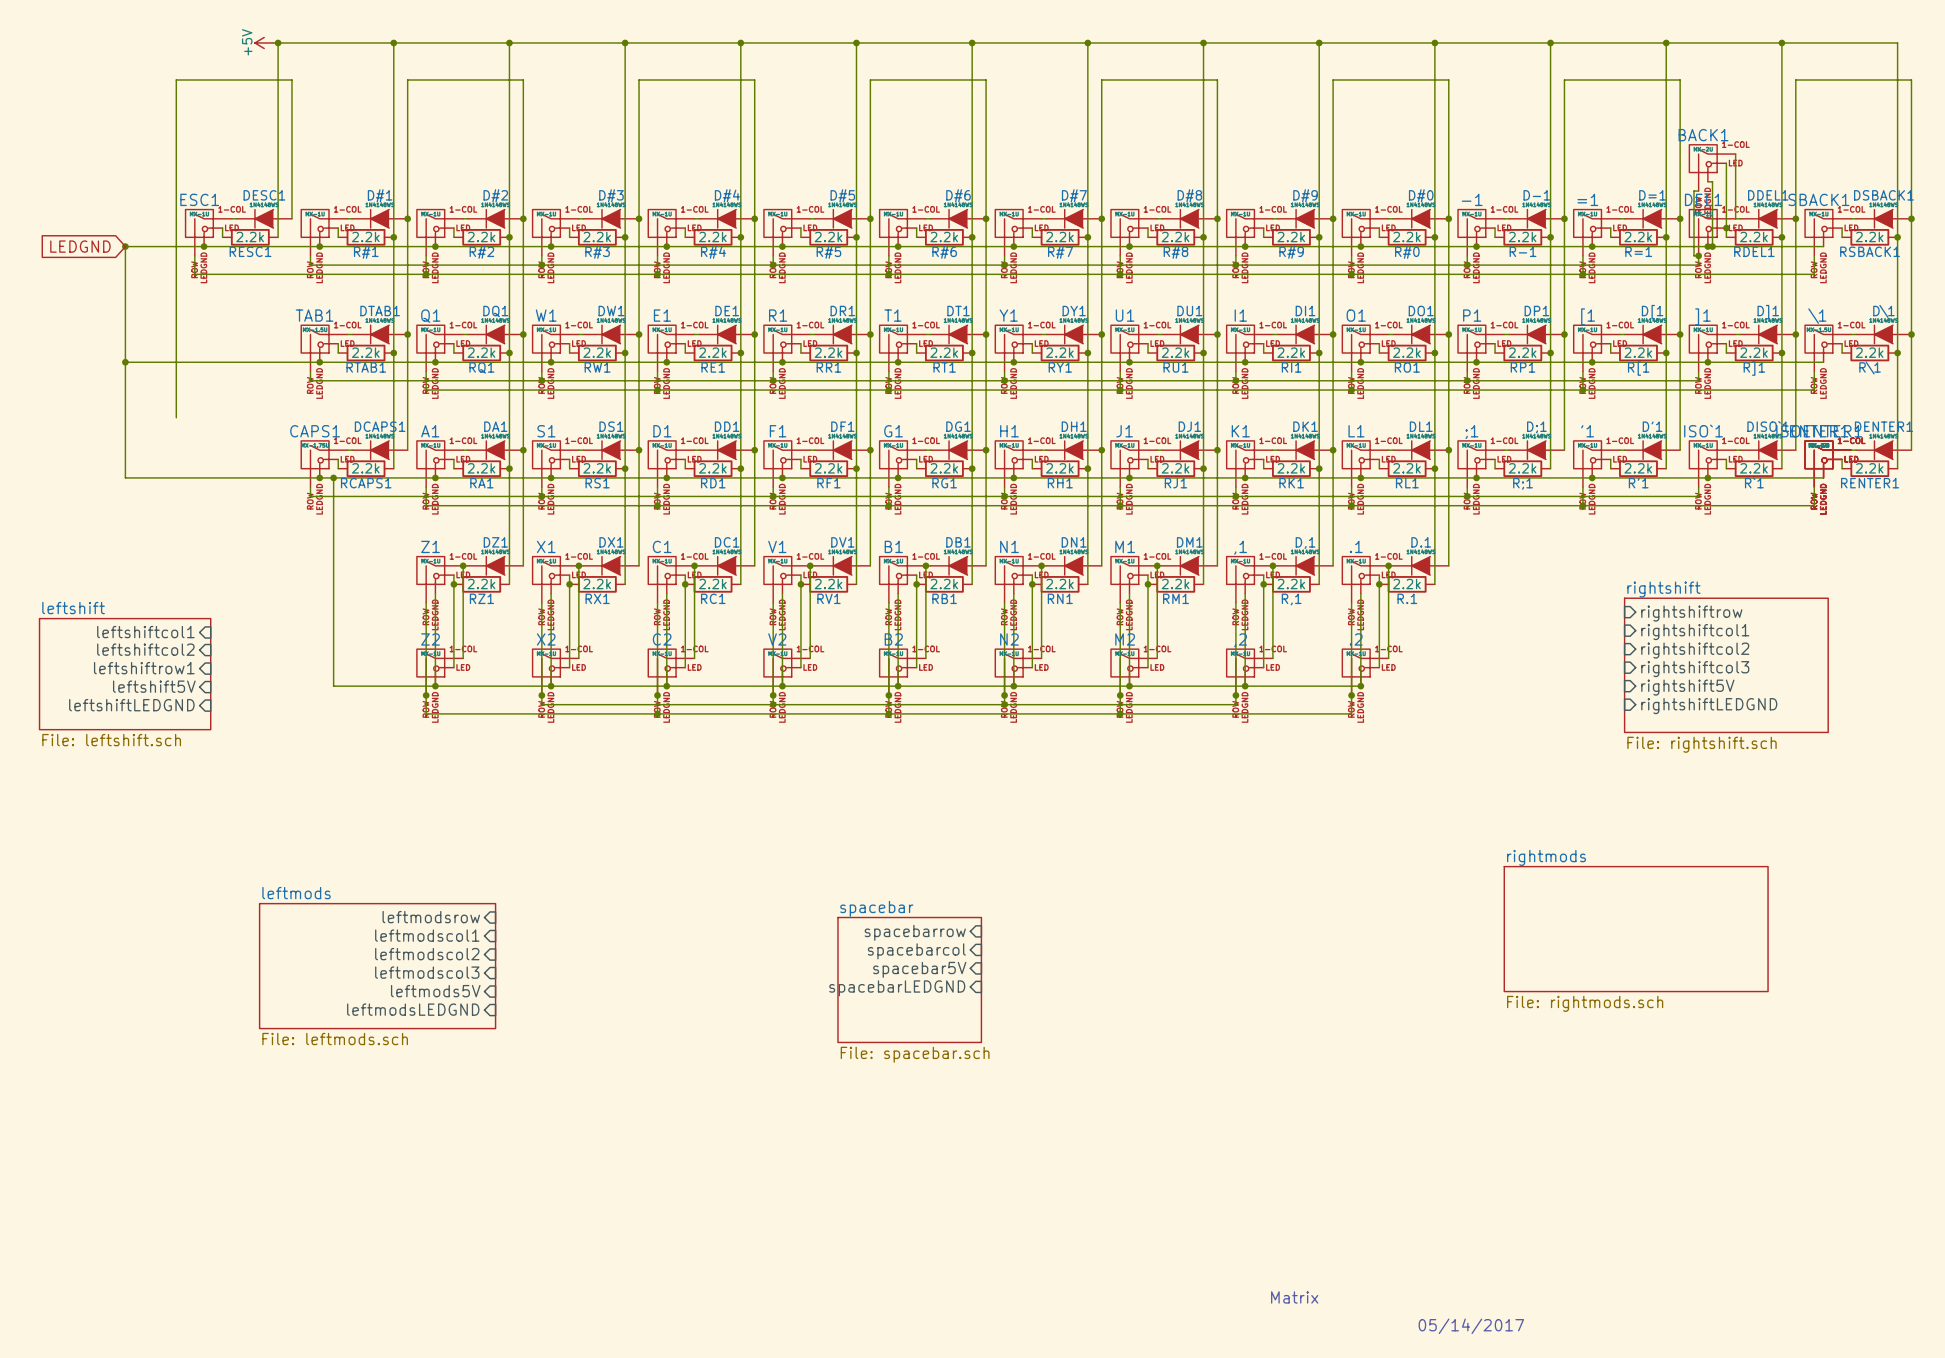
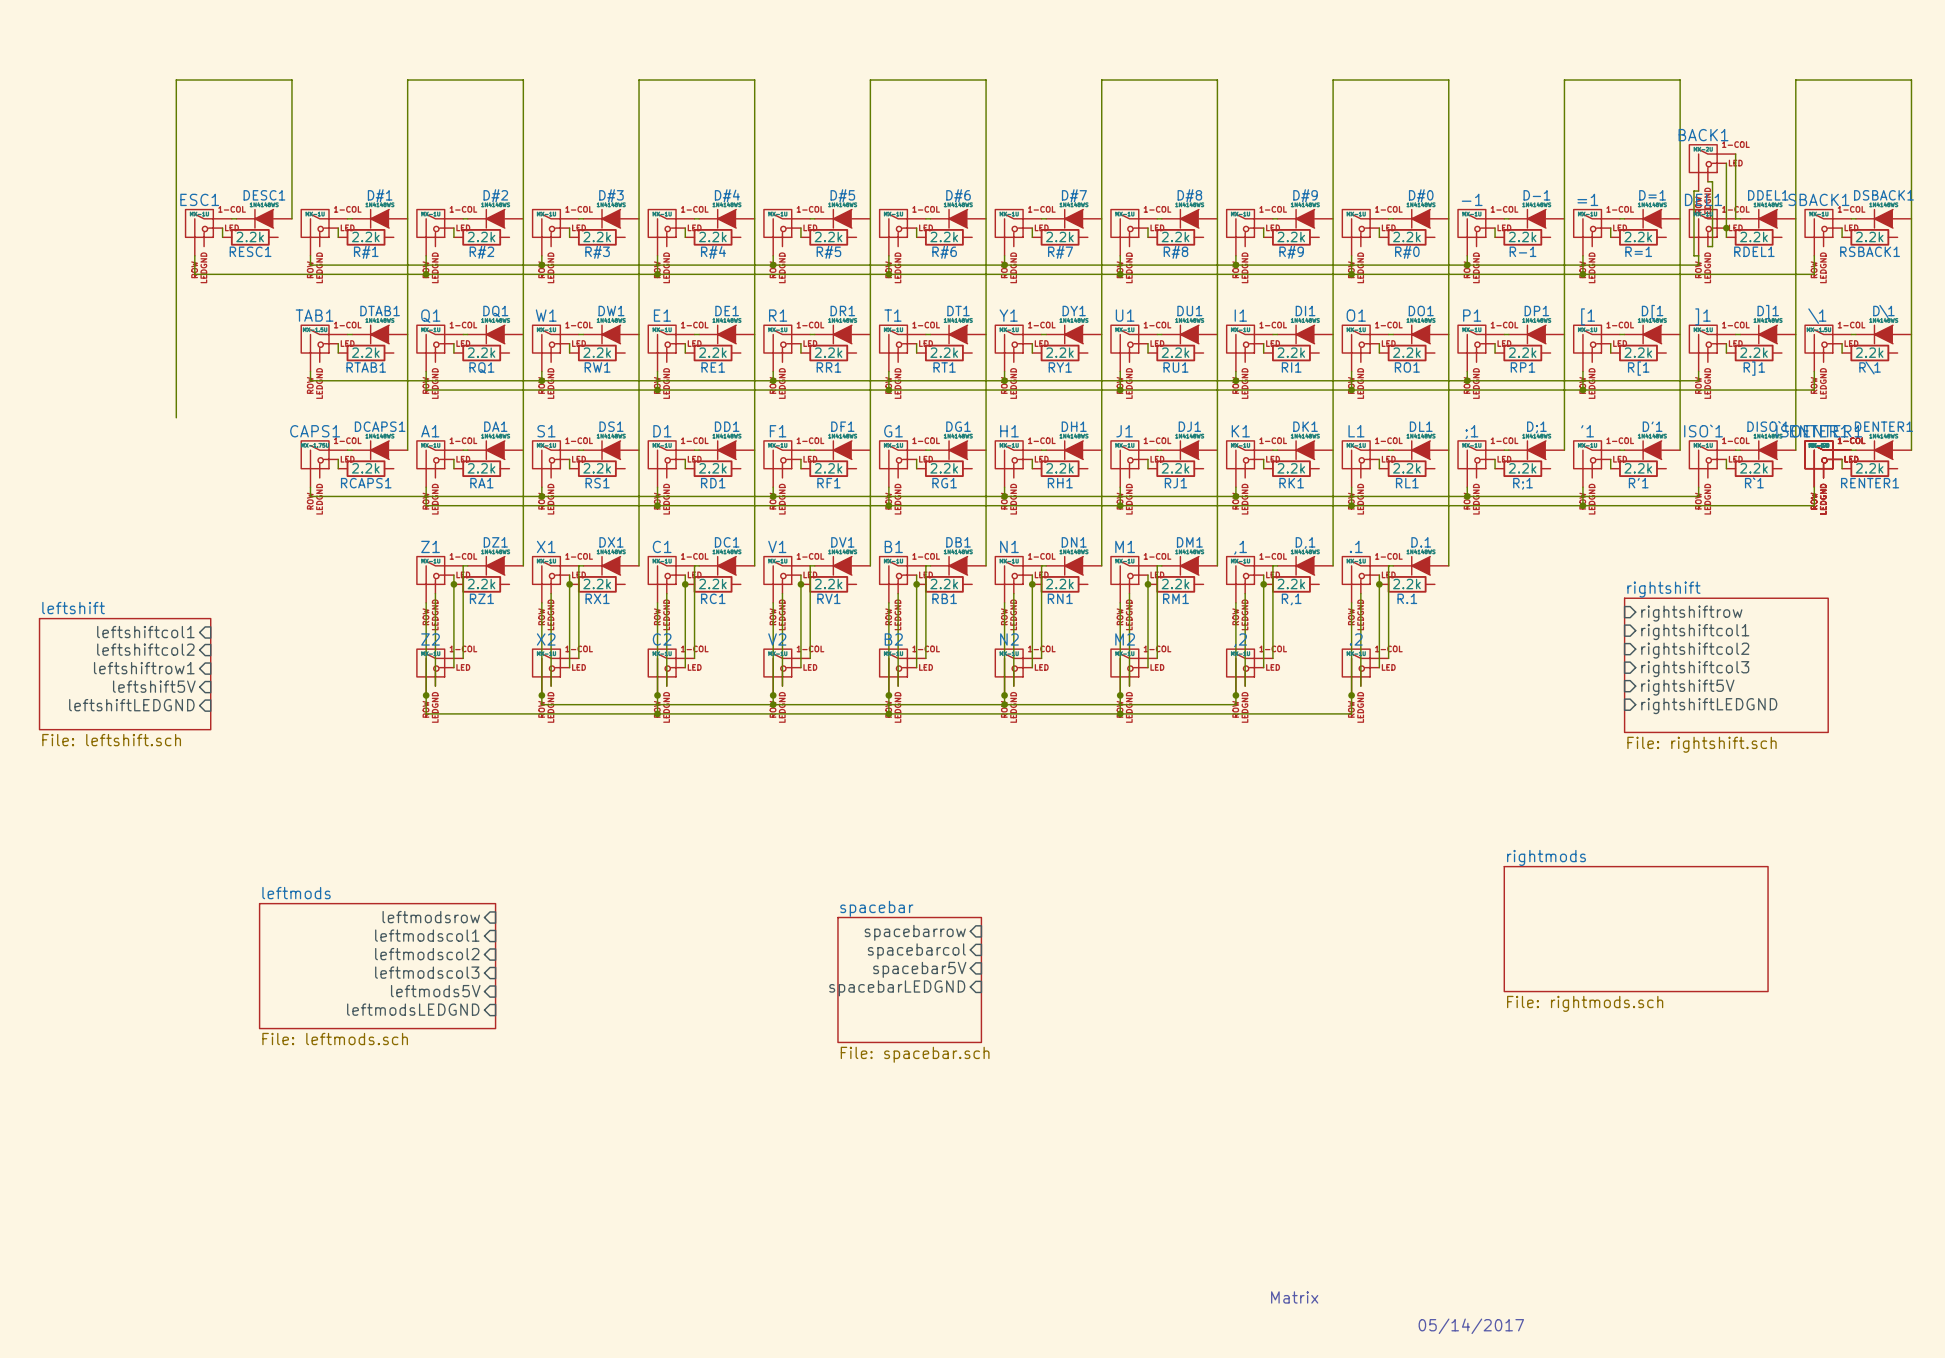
power symbol: +5V (264, 42) -> none
wire: (273, 42) (1897, 42) (1897, 468) -> none
wire: (278, 42) (278, 237) -> none
junction: (278, 42) -> none
wire: (393, 42) (393, 468) -> none
junction: (393, 42) -> none
wire: (509, 42) (509, 584) -> none
junction: (509, 42) -> none
wire: (625, 42) (625, 584) -> none
junction: (625, 42) -> none
wire: (740, 42) (740, 584) -> none
junction: (740, 42) -> none
wire: (856, 42) (856, 584) -> none
junction: (856, 42) -> none
wire: (972, 42) (972, 584) -> none
junction: (972, 42) -> none
wire: (1087, 42) (1087, 584) -> none
junction: (1087, 42) -> none
wire: (1203, 42) (1203, 584) -> none
junction: (1203, 42) -> none
wire: (1319, 42) (1319, 584) -> none
junction: (1319, 42) -> none
wire: (1434, 42) (1434, 584) -> none
junction: (1434, 42) -> none
wire: (1550, 42) (1550, 468) -> none
junction: (1550, 42) -> none
wire: (1666, 42) (1666, 468) -> none
junction: (1666, 42) -> none
wire: (1781, 42) (1781, 468) -> none
junction: (1781, 42) -> none
junction: (407, 218) -> none
junction: (523, 218) -> none
junction: (639, 218) -> none
junction: (754, 218) -> none
junction: (870, 218) -> none
junction: (986, 218) -> none
junction: (1101, 218) -> none
junction: (1217, 218) -> none
junction: (1333, 218) -> none
junction: (1448, 218) -> none
junction: (1564, 218) -> none
junction: (1680, 218) -> none
junction: (1795, 218) -> none
junction: (1911, 218) -> none
junction: (393, 237) -> none
junction: (509, 237) -> none
junction: (625, 237) -> none
junction: (740, 237) -> none
junction: (856, 237) -> none
junction: (972, 237) -> none
junction: (1087, 237) -> none
junction: (1203, 237) -> none
junction: (1319, 237) -> none
junction: (1434, 237) -> none
junction: (1550, 237) -> none
junction: (1666, 237) -> none
junction: (1781, 237) -> none
junction: (1897, 237) -> none
global label: LEDGND (80, 246) -> none
junction: (125, 246) -> none
junction: (204, 246) -> none
junction: (319, 246) -> none
junction: (435, 246) -> none
junction: (551, 246) -> none
junction: (666, 246) -> none
junction: (782, 246) -> none
junction: (898, 246) -> none
junction: (1013, 246) -> none
junction: (1129, 246) -> none
junction: (1245, 246) -> none
junction: (1360, 246) -> none
junction: (1476, 246) -> none
junction: (1592, 246) -> none
wire: (1707, 246) (125, 246) (125, 477) (1823, 477) -> none
junction: (1707, 246) -> none
wire: (1712, 246) (1823, 246) -> none
junction: (1712, 246) -> none
junction: (1698, 255) -> none
junction: (407, 334) -> none
junction: (523, 334) -> none
junction: (639, 334) -> none
junction: (754, 334) -> none
junction: (870, 334) -> none
junction: (986, 334) -> none
junction: (1101, 334) -> none
junction: (1217, 334) -> none
junction: (1333, 334) -> none
junction: (1448, 334) -> none
junction: (1564, 334) -> none
junction: (1680, 334) -> none
junction: (1795, 334) -> none
junction: (1911, 334) -> none
junction: (393, 353) -> none
junction: (509, 353) -> none
junction: (625, 353) -> none
junction: (740, 353) -> none
junction: (856, 353) -> none
junction: (972, 353) -> none
junction: (1087, 353) -> none
junction: (1203, 353) -> none
junction: (1319, 353) -> none
junction: (1434, 353) -> none
junction: (1550, 353) -> none
junction: (1666, 353) -> none
junction: (1781, 353) -> none
junction: (1897, 353) -> none
wire: (125, 362) (1823, 362) -> none
junction: (125, 362) -> none
junction: (319, 362) -> none
junction: (435, 362) -> none
junction: (551, 362) -> none
junction: (666, 362) -> none
junction: (782, 362) -> none
junction: (898, 362) -> none
junction: (1013, 362) -> none
junction: (1129, 362) -> none
junction: (1245, 362) -> none
junction: (1360, 362) -> none
junction: (1476, 362) -> none
junction: (1592, 362) -> none
junction: (1707, 362) -> none
junction: (523, 450) -> none
junction: (639, 450) -> none
junction: (754, 450) -> none
junction: (870, 450) -> none
junction: (986, 450) -> none
junction: (1101, 450) -> none
junction: (1217, 450) -> none
junction: (1333, 450) -> none
junction: (1448, 450) -> none
junction: (509, 468) -> none
junction: (625, 468) -> none
junction: (740, 468) -> none
junction: (856, 468) -> none
junction: (972, 468) -> none
junction: (1087, 468) -> none
junction: (1203, 468) -> none
junction: (1319, 468) -> none
junction: (1434, 468) -> none
junction: (319, 477) -> none
wire: (333, 477) (333, 686) (1360, 686) -> none
junction: (333, 477) -> none
junction: (435, 477) -> none
junction: (551, 477) -> none
junction: (666, 477) -> none
junction: (782, 477) -> none
junction: (898, 477) -> none
junction: (1013, 477) -> none
junction: (1129, 477) -> none
junction: (1245, 477) -> none
junction: (1360, 477) -> none
junction: (1476, 477) -> none
junction: (1592, 477) -> none
junction: (1707, 477) -> none
junction: (463, 565) -> none
junction: (578, 565) -> none
junction: (694, 565) -> none
junction: (810, 565) -> none
junction: (925, 565) -> none
junction: (1041, 565) -> none
junction: (1157, 565) -> none
junction: (1272, 565) -> none
junction: (1388, 565) -> none
junction: (435, 686) -> none
junction: (551, 686) -> none
junction: (666, 686) -> none
junction: (782, 686) -> none
junction: (898, 686) -> none
junction: (1013, 686) -> none
junction: (1129, 686) -> none
junction: (1245, 686) -> none
junction: (1360, 686) -> none

